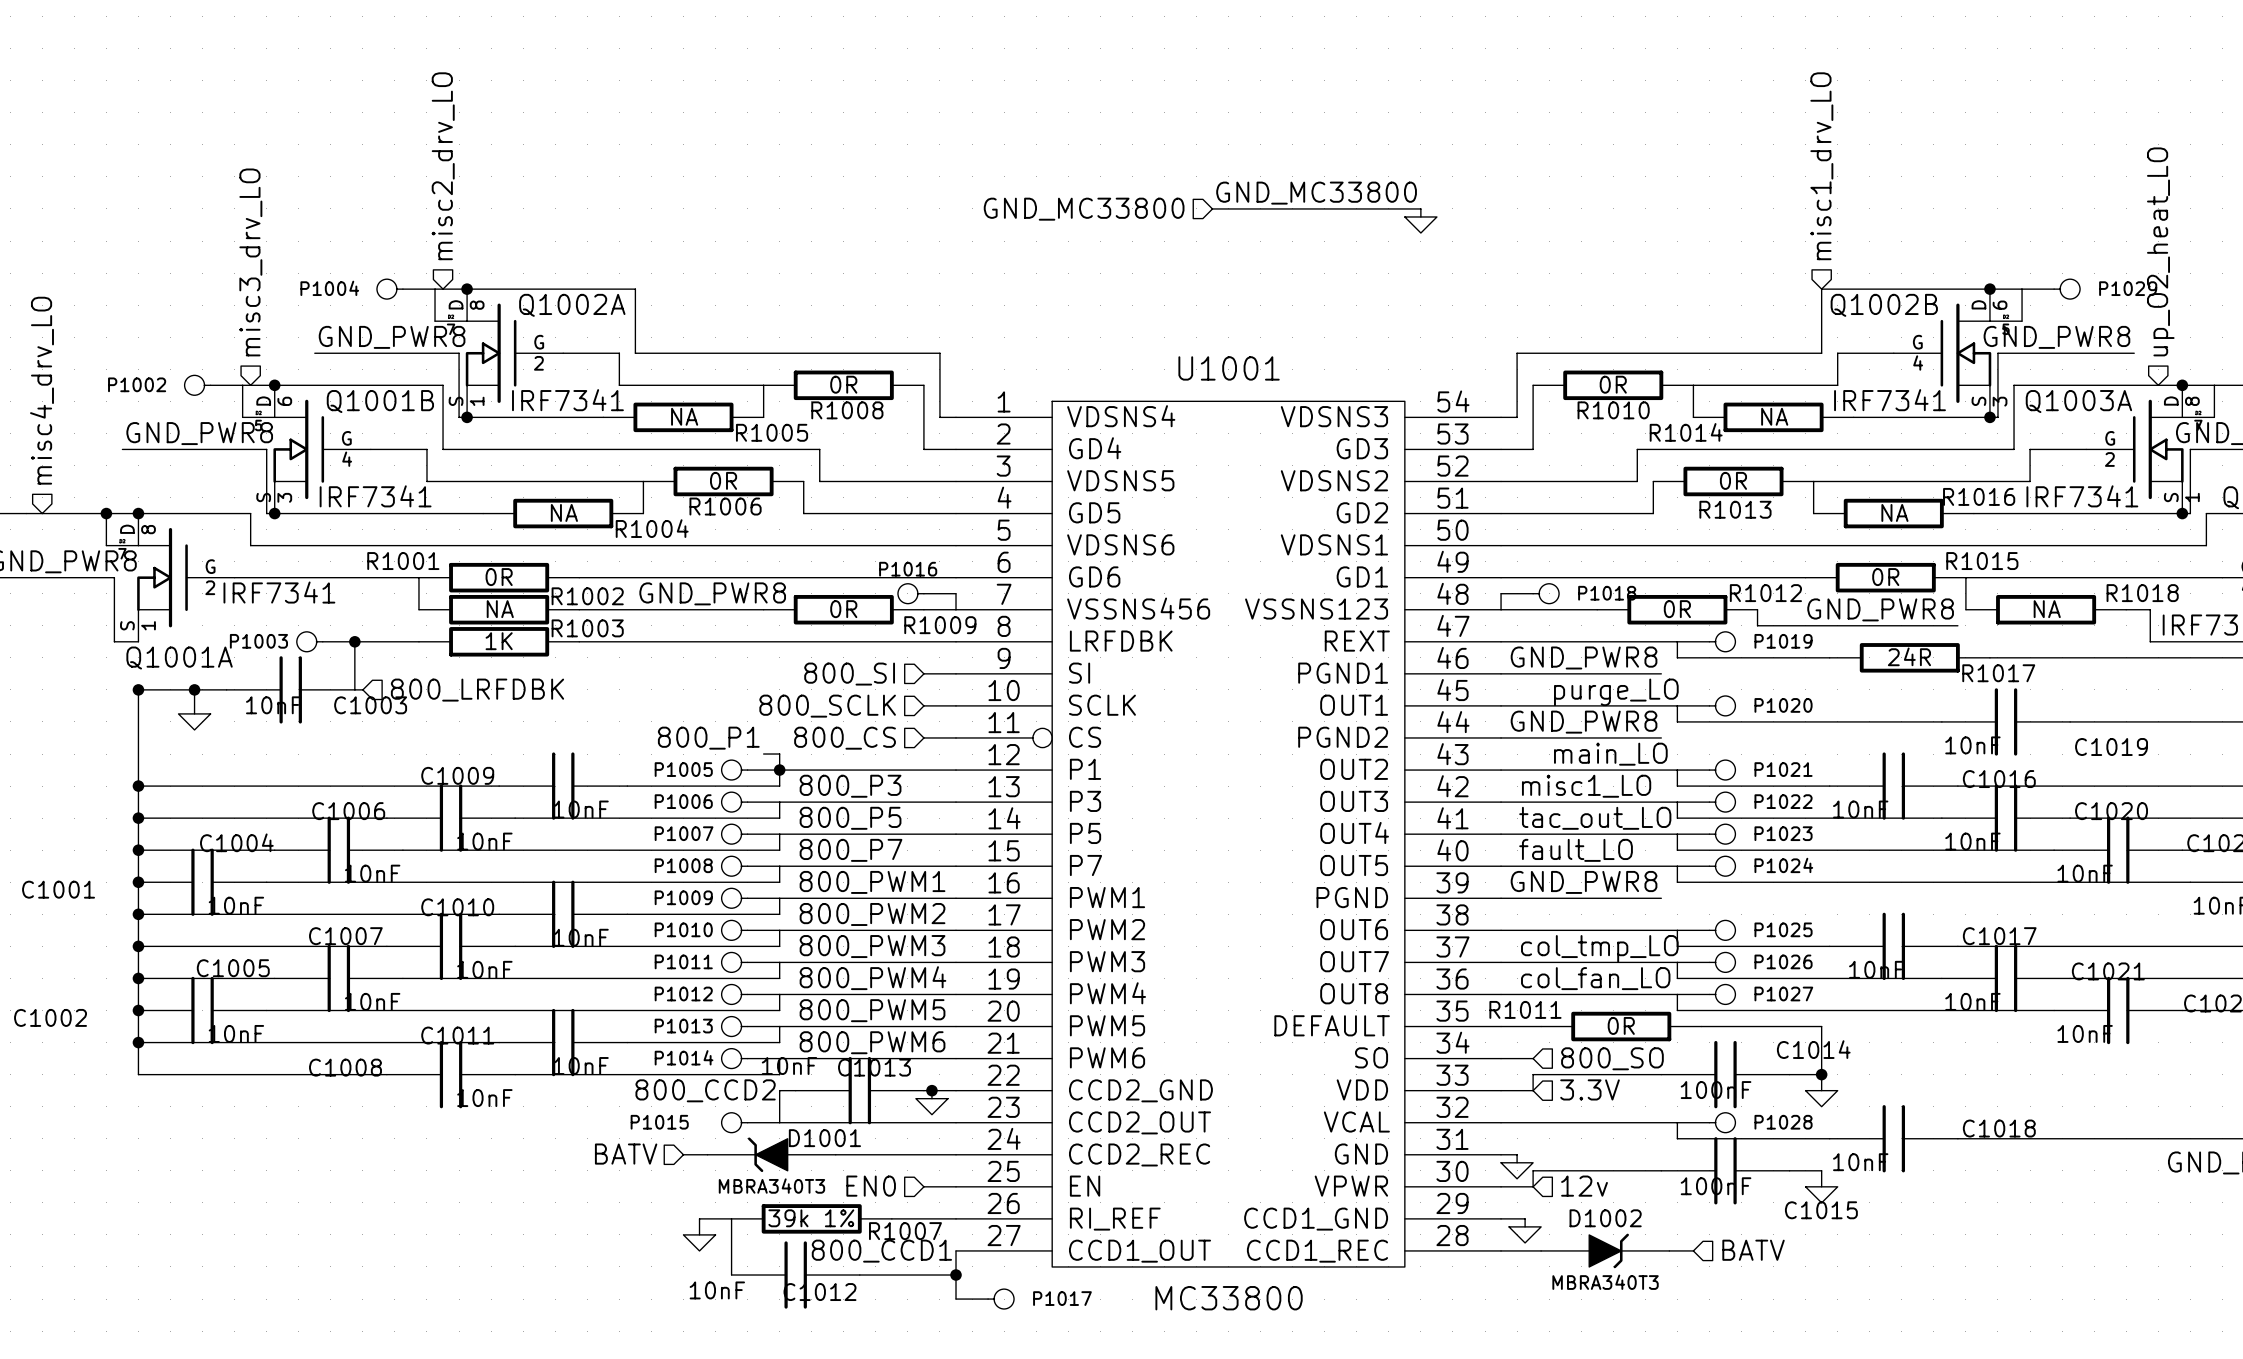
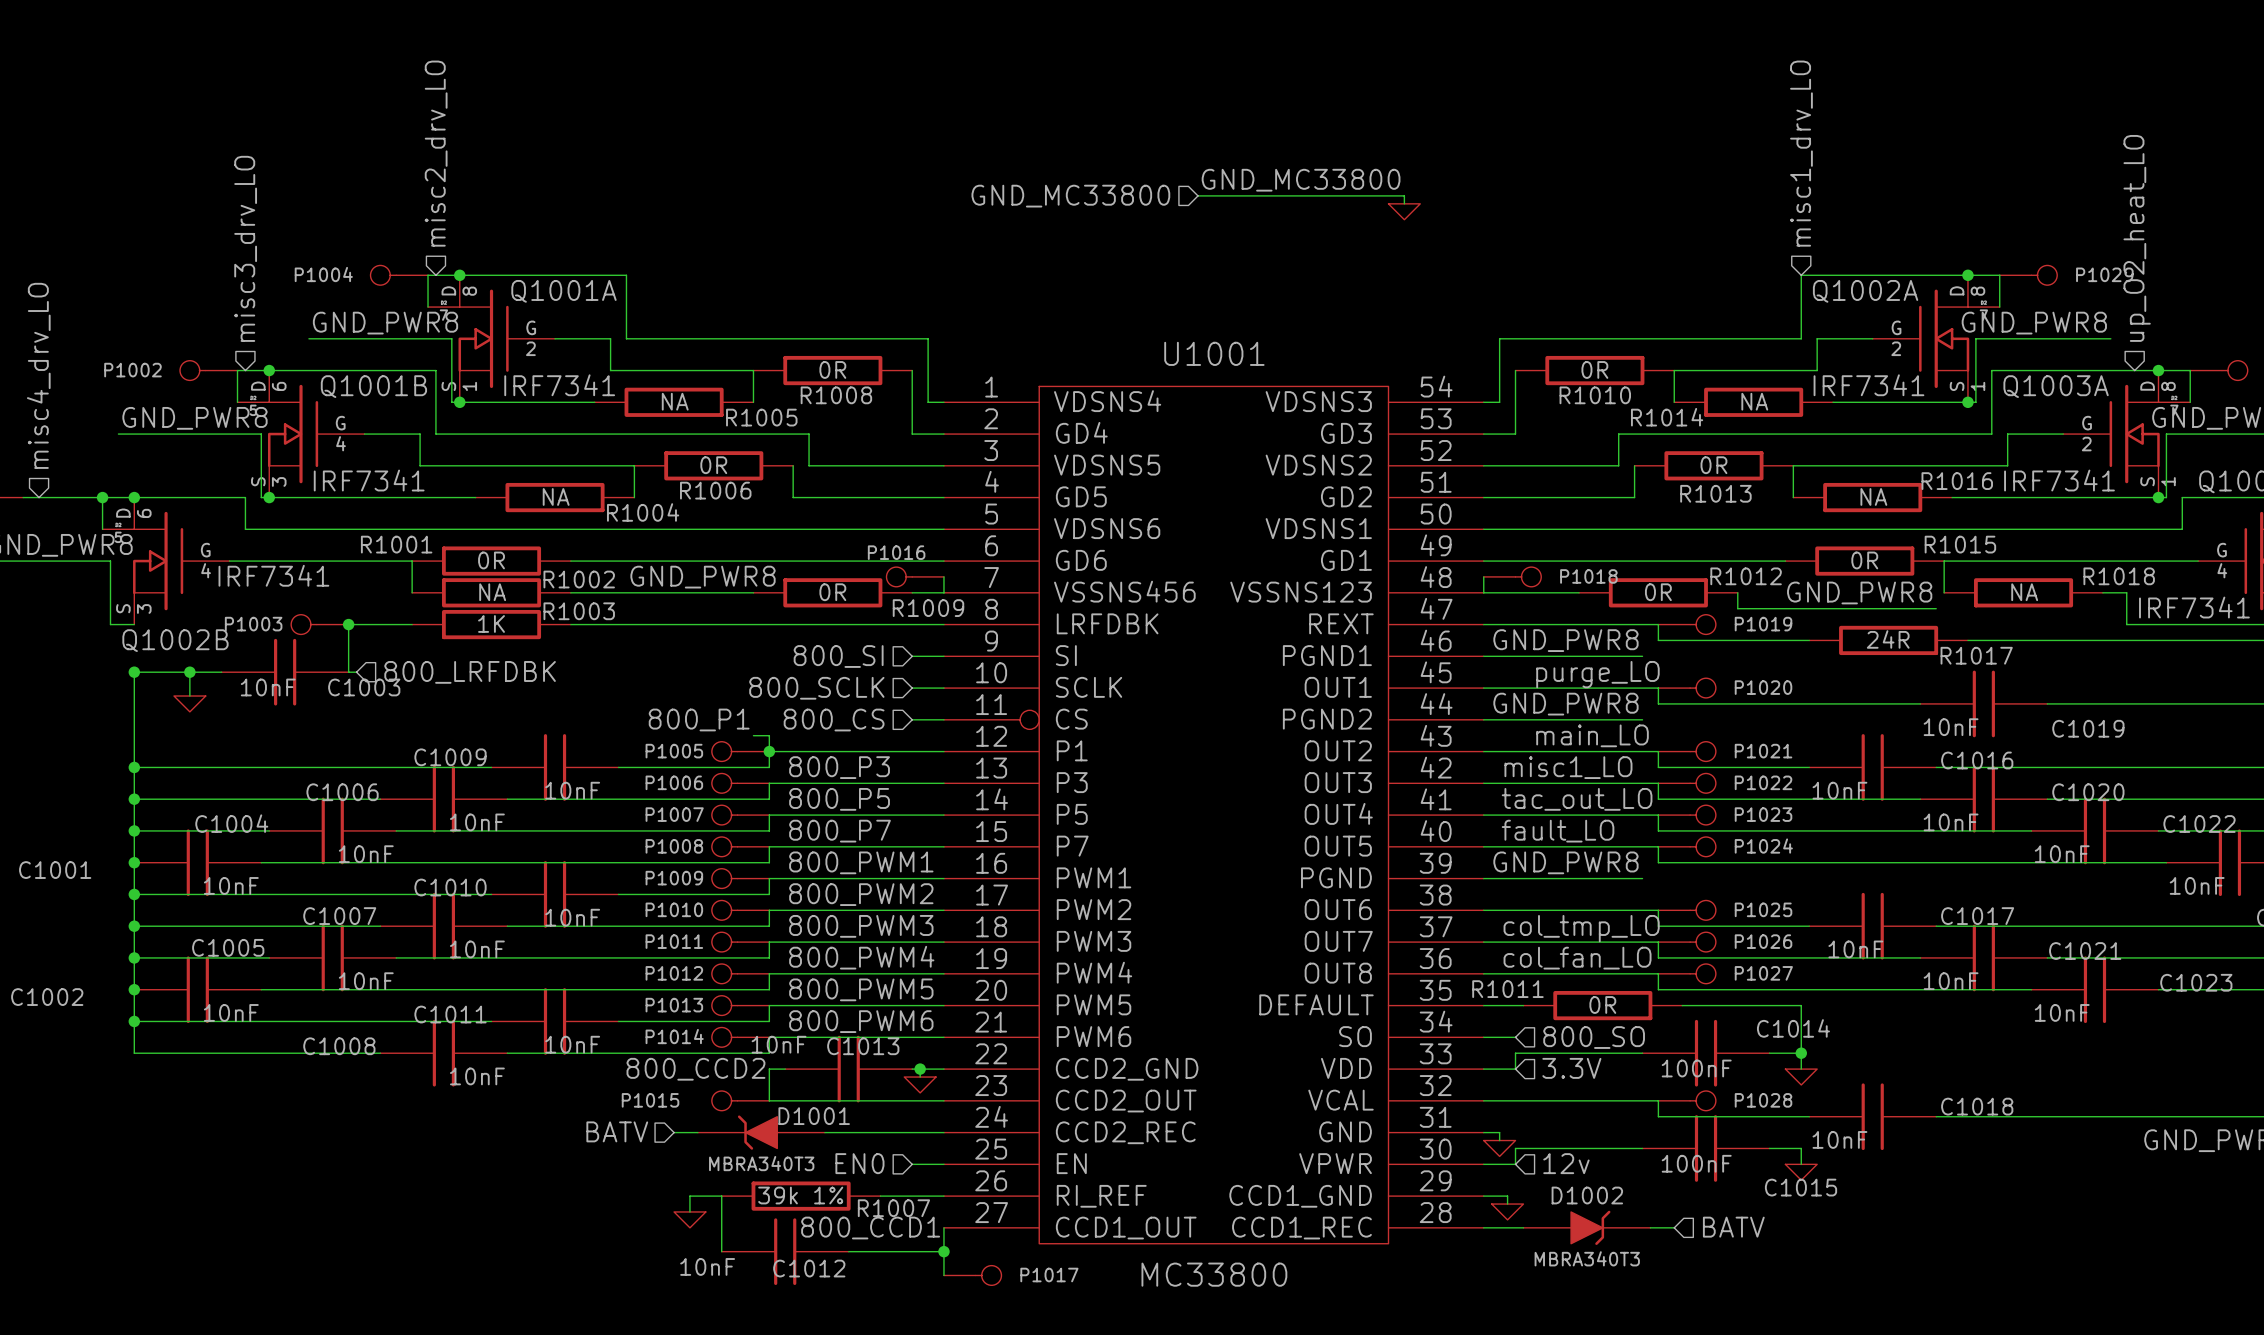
Q1002A name: Q1002A (572, 305) -> Q1001A (563, 291)
Q1002B name position: Q1002B (1884, 305) -> Q1002B (175, 640)
Q1002B position: (1957, 353) -> (166, 561)
Q1002A: none -> IRF7341 (1936, 338)
Q1002B flip: as is (1965, 353) -> left-right (158, 561)
Q1001A: IRF7341 (170, 577) -> none

